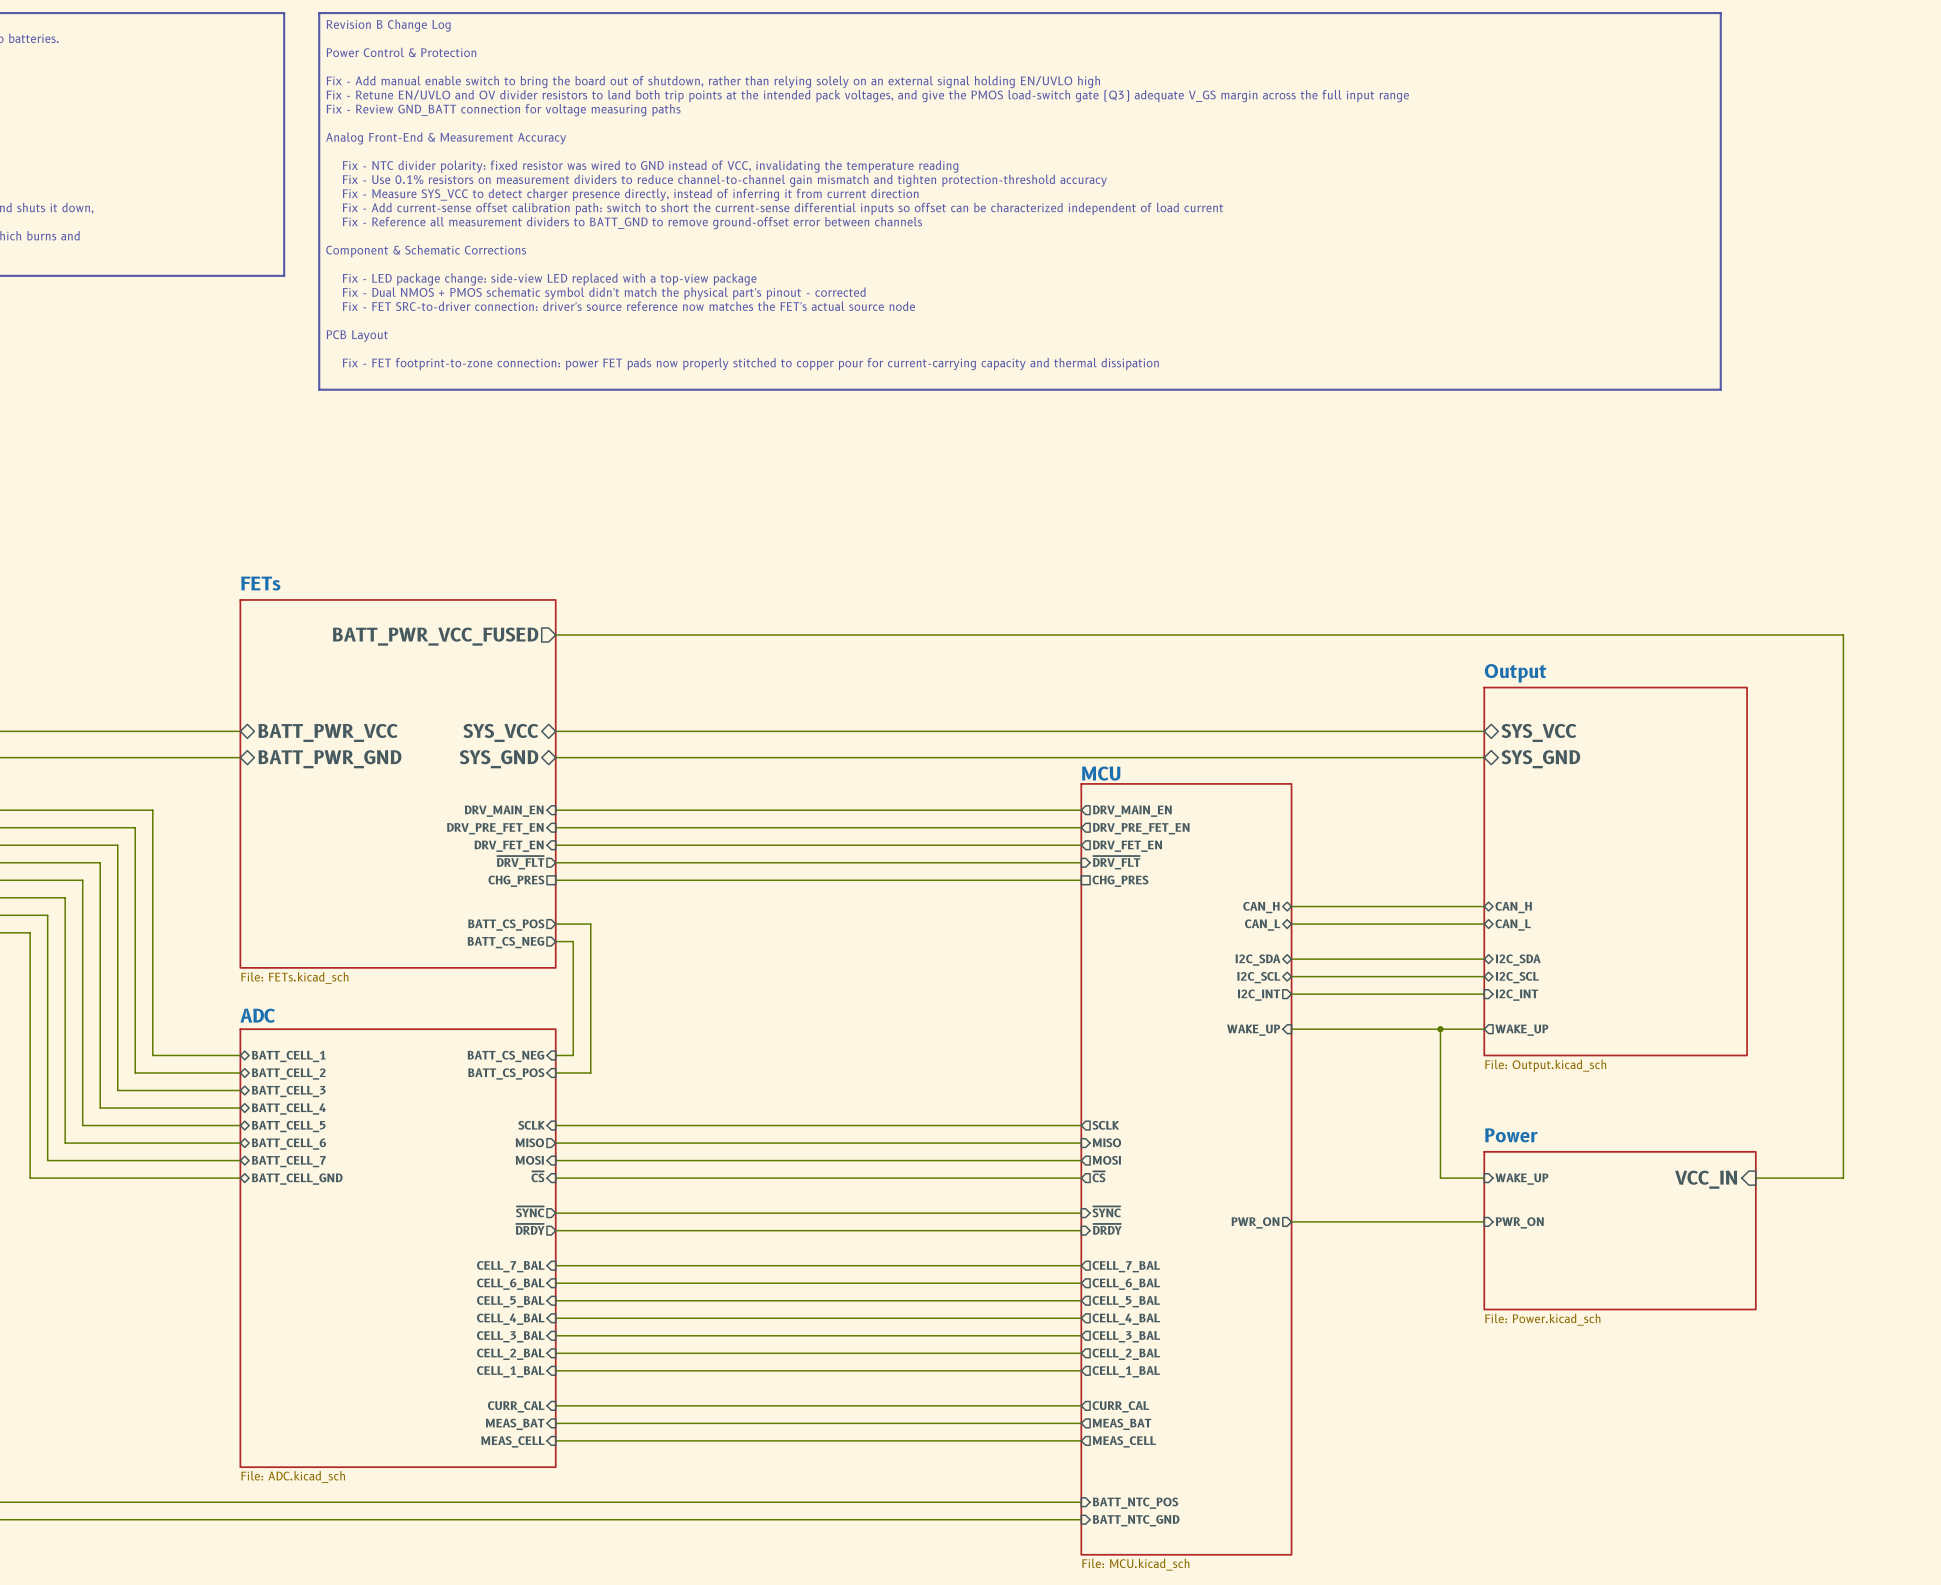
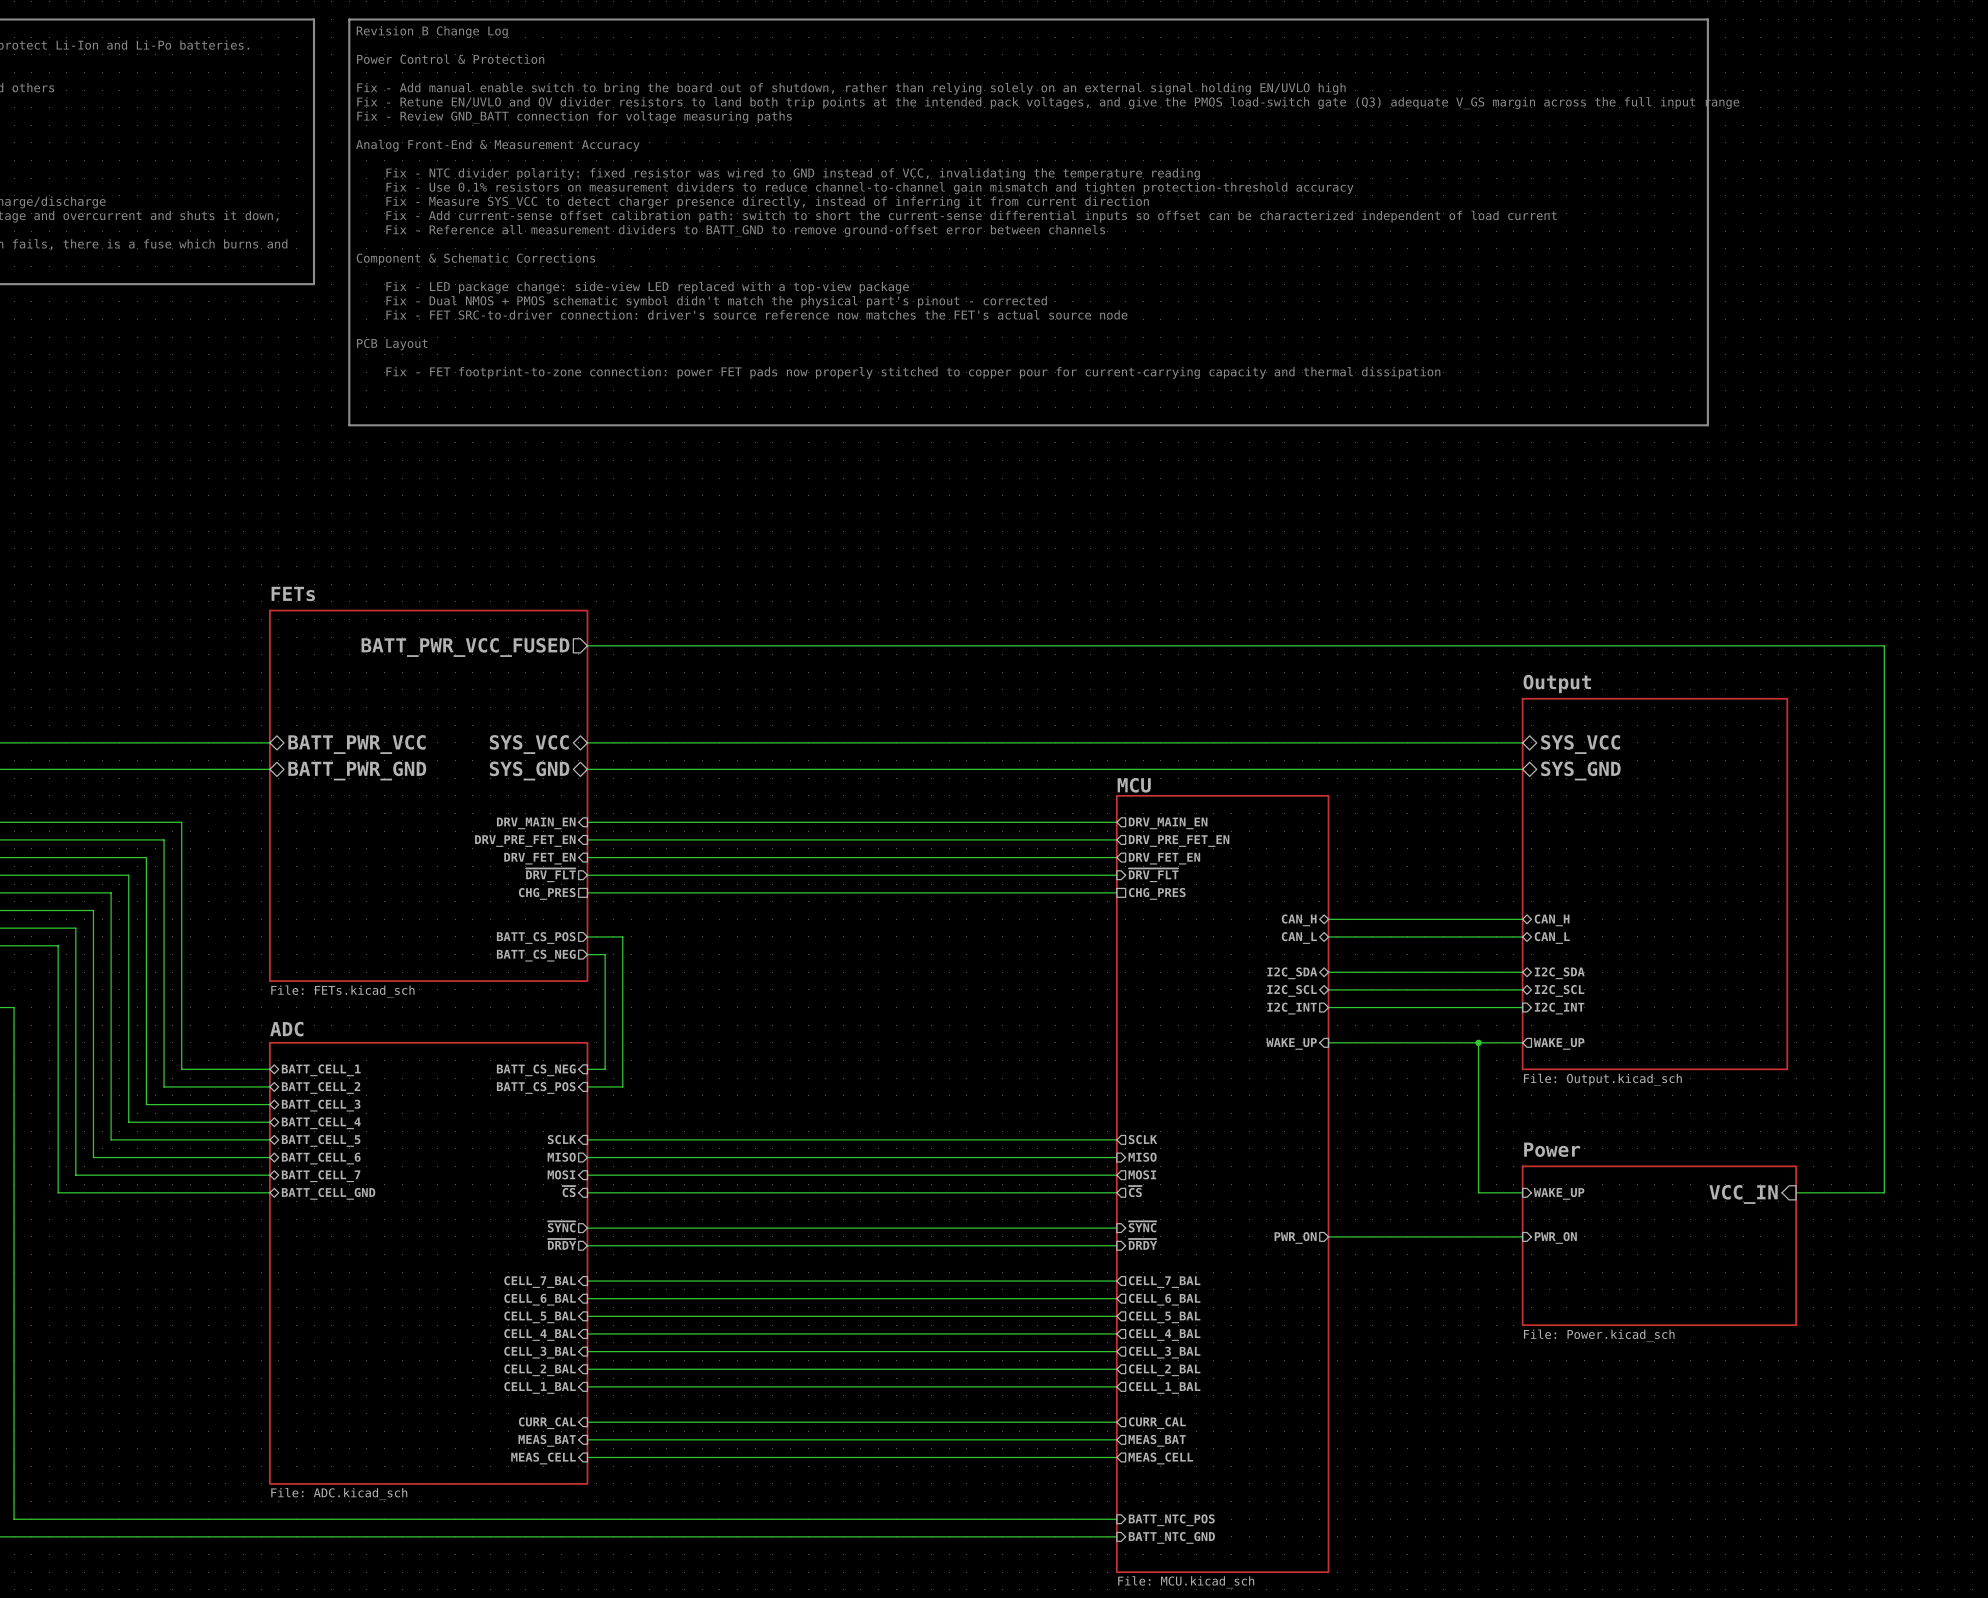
line: (1668, 13) (1720, 13) (1720, 389) (319, 389) -> (1707, 19) (1707, 425) (349, 425) (349, 398)

